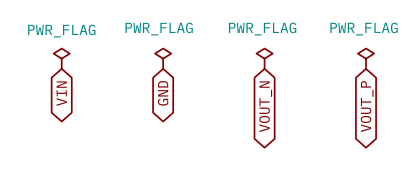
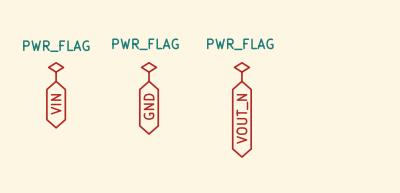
power symbol: PWR_FLAG (366, 58) -> none
global label: VOUT_P (367, 106) -> none

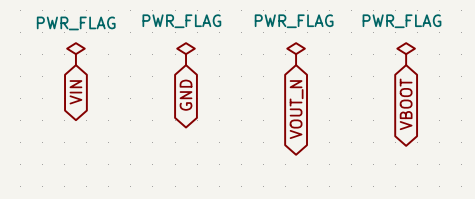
power symbol: none -> PWR_FLAG (406, 54)
global label: none -> VBOOT (406, 104)

